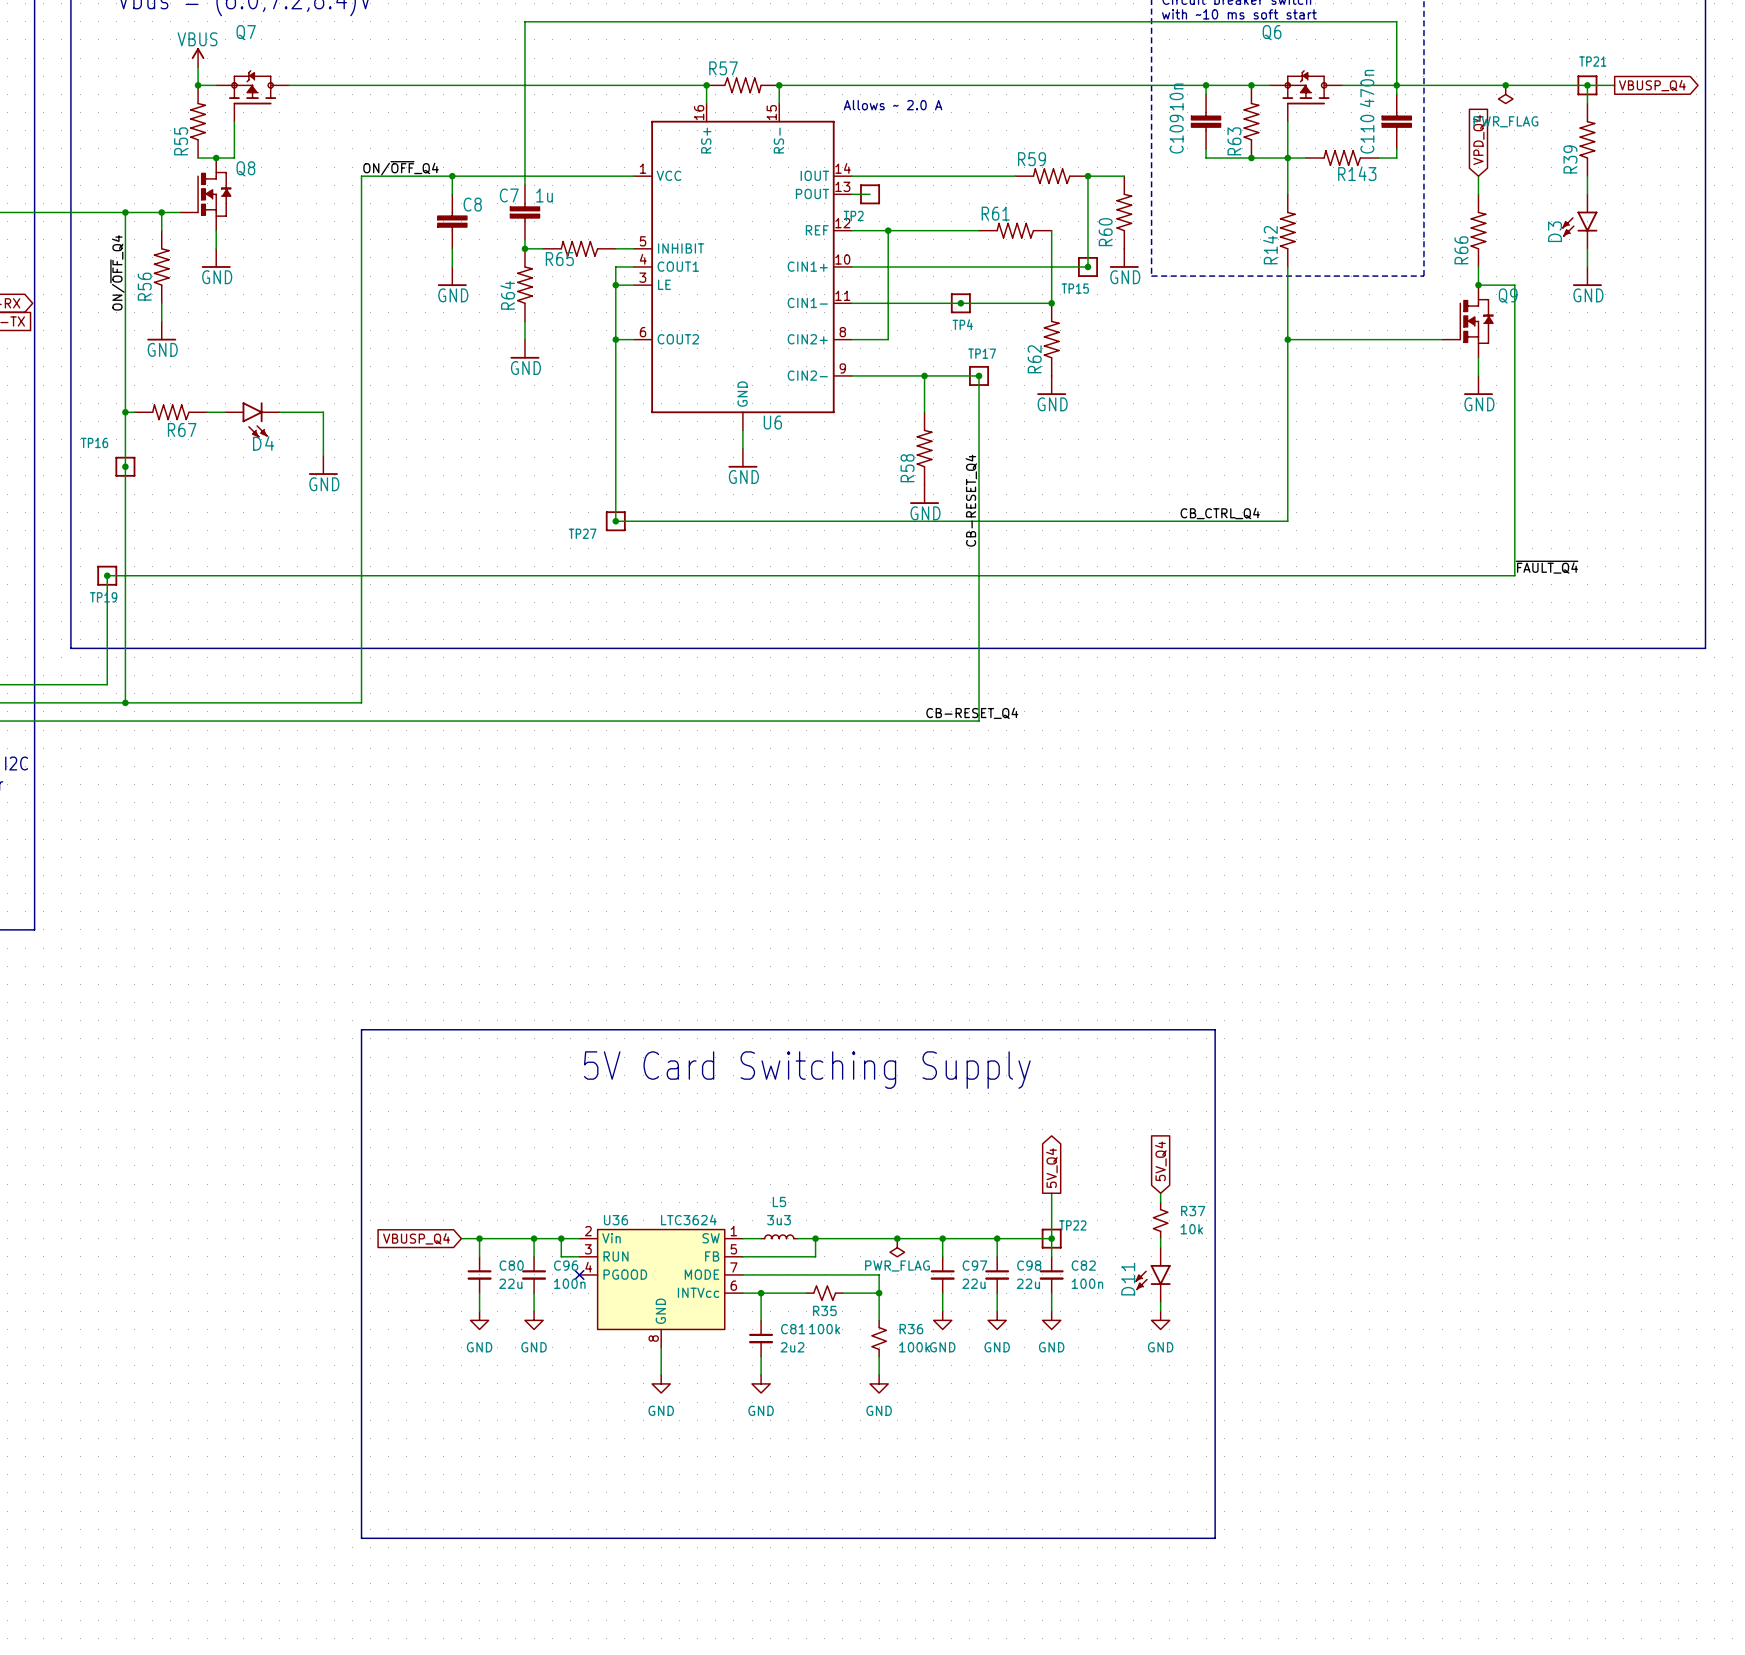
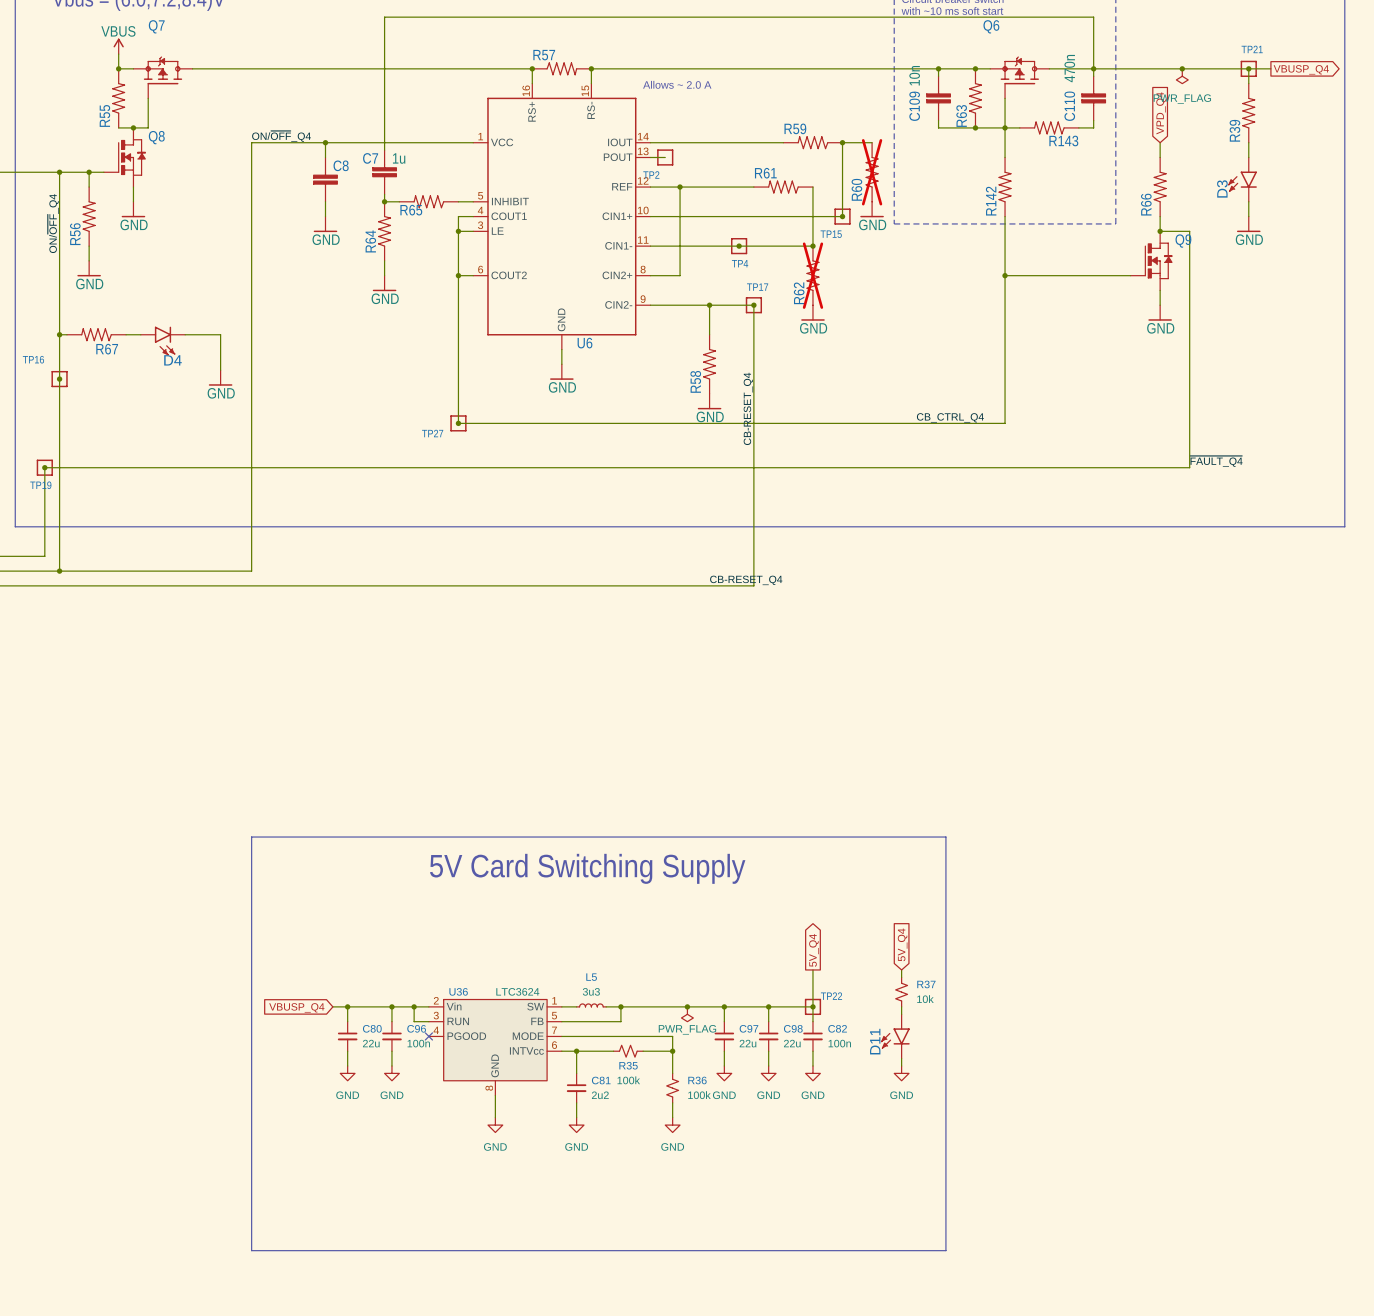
R60 do-not-place cross: none -> (872, 172)
R62 do-not-place cross: none -> (812, 275)

